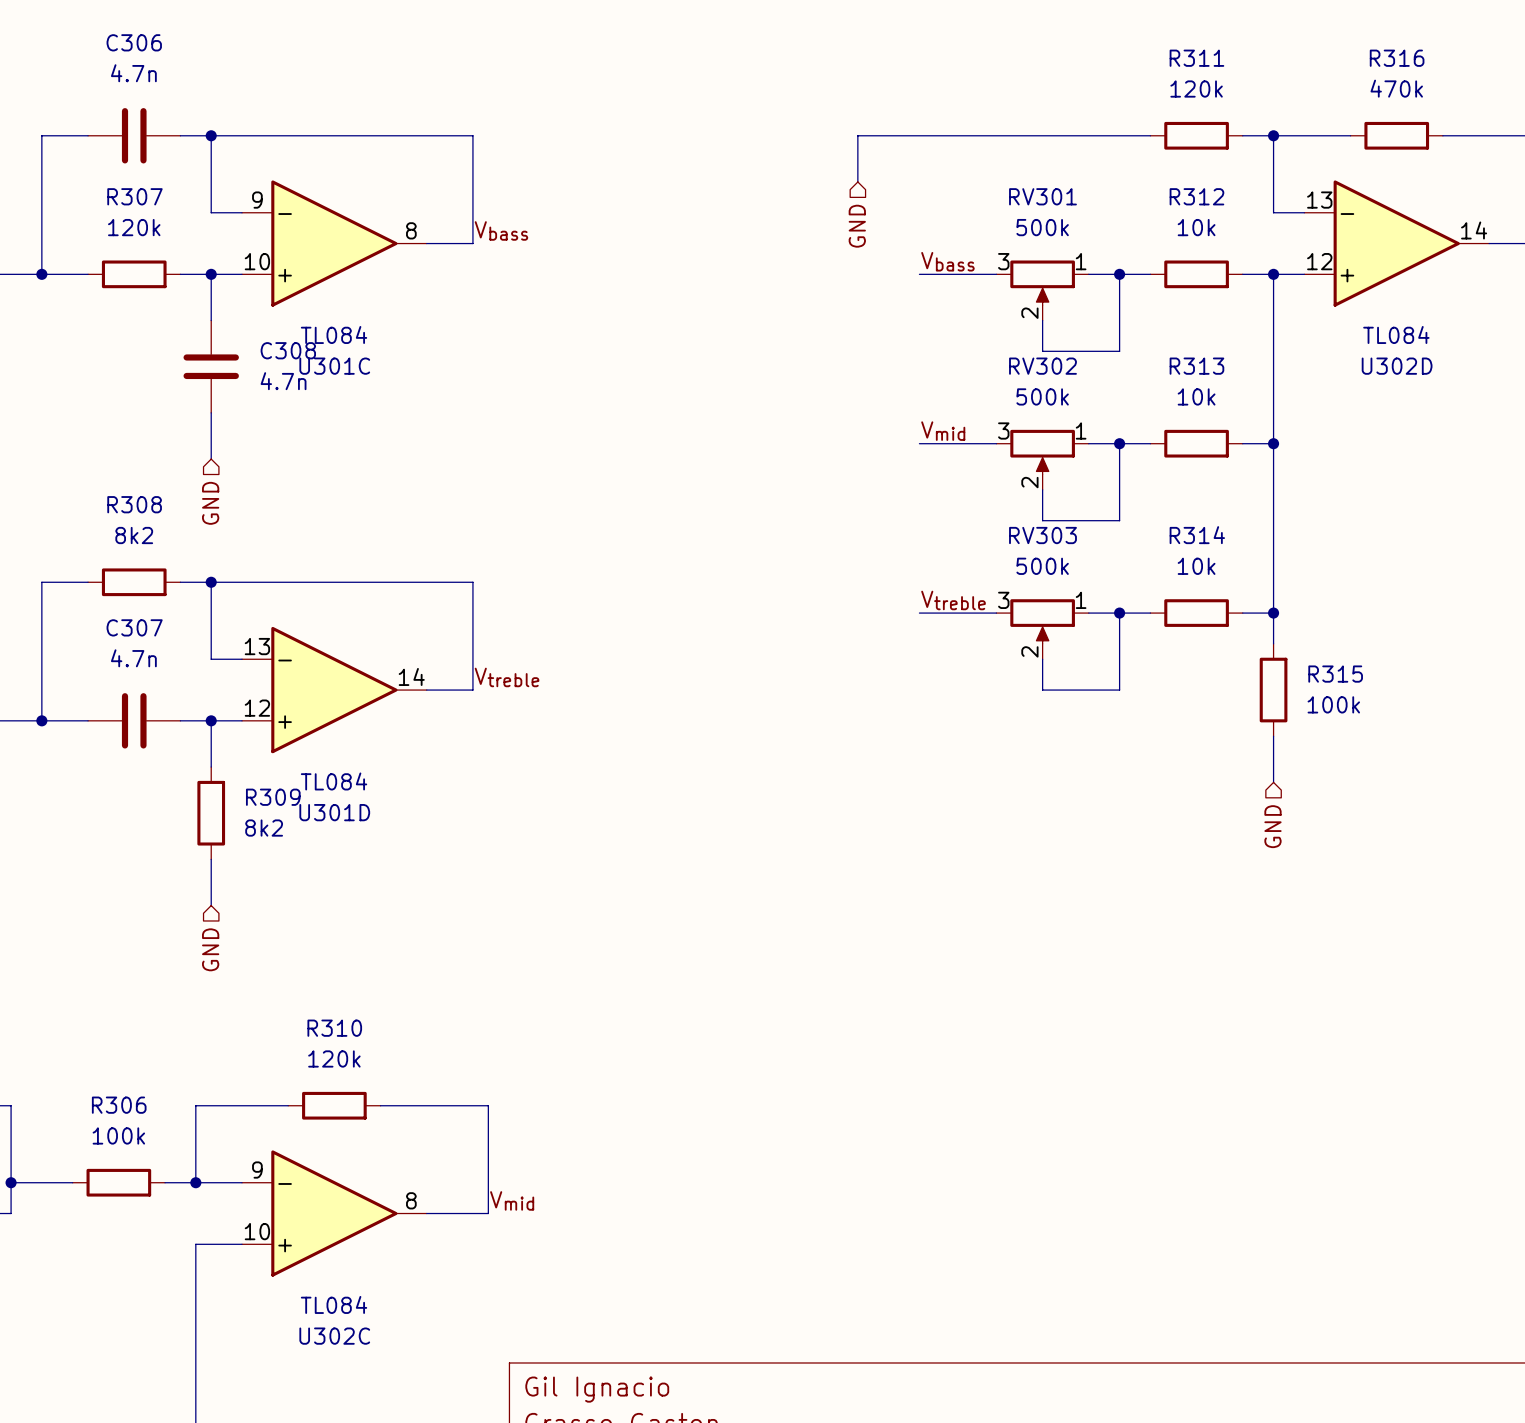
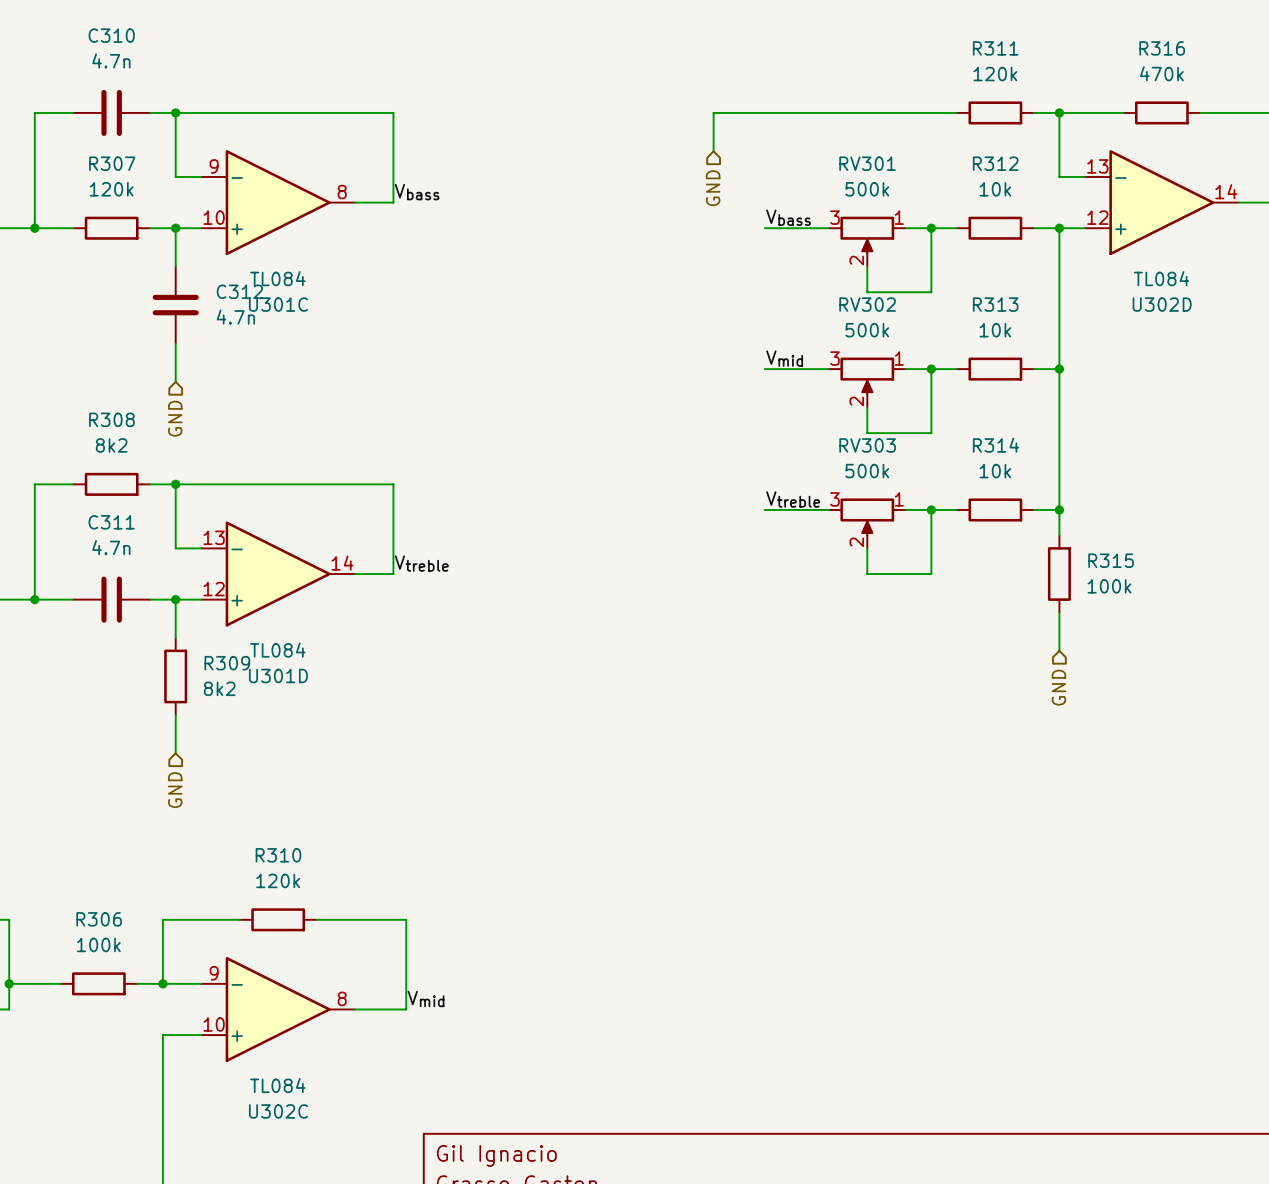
C306 name: C306 (134, 42) -> C310 (111, 35)
C308 name: C308 (288, 350) -> C312 (239, 291)
C307 name: C307 (134, 627) -> C311 (111, 522)

